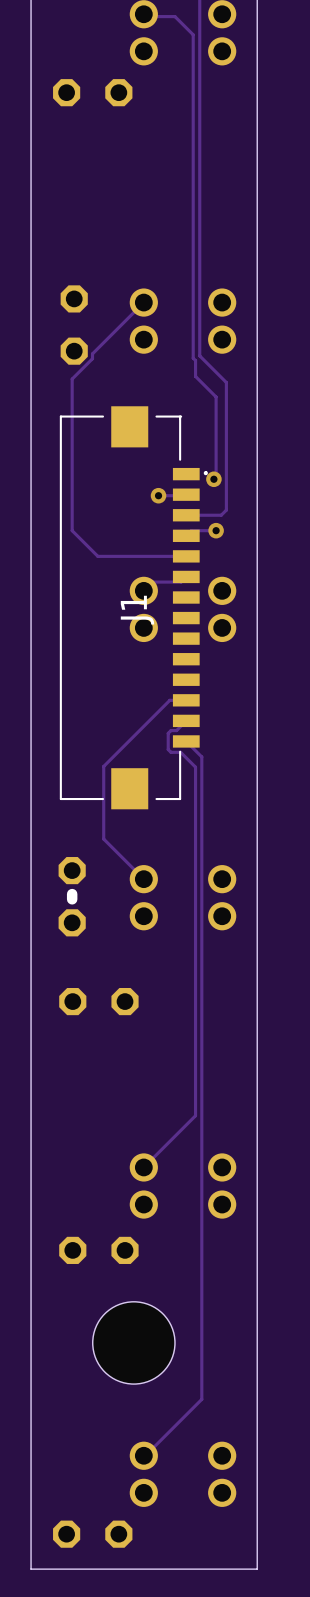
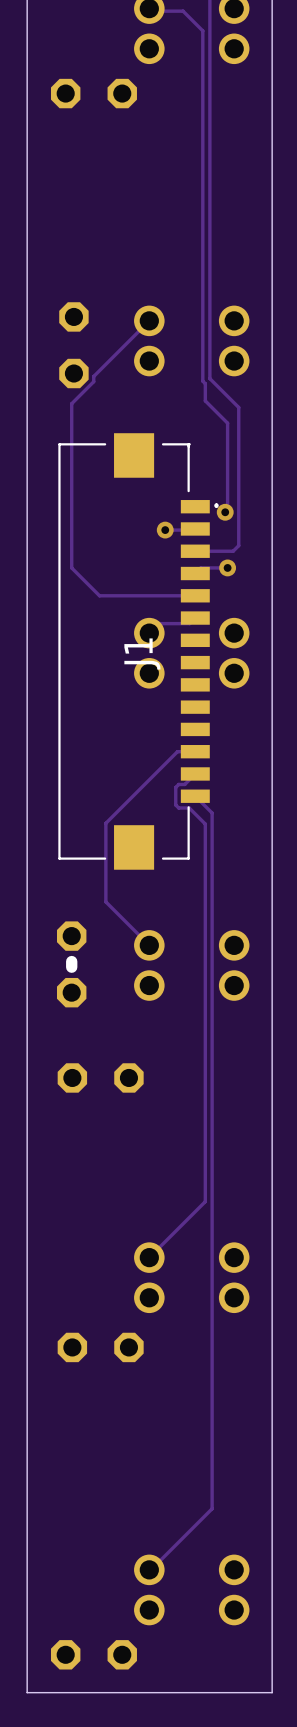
hole: (133, 1342) -> none

